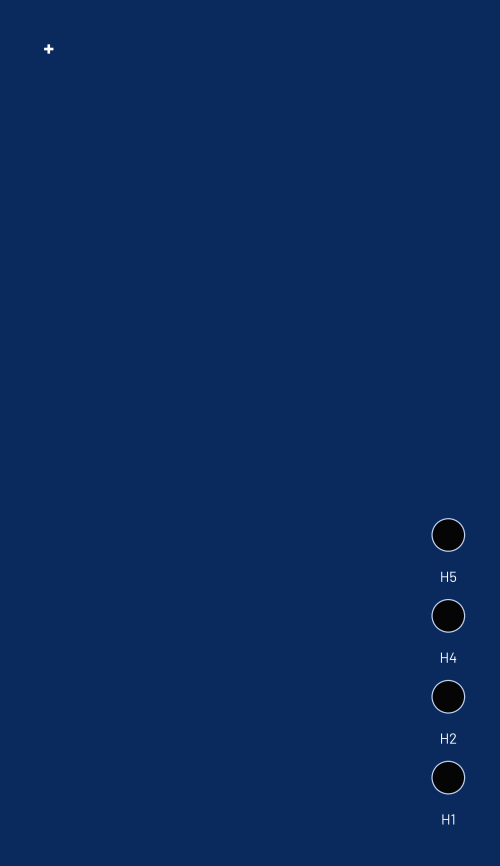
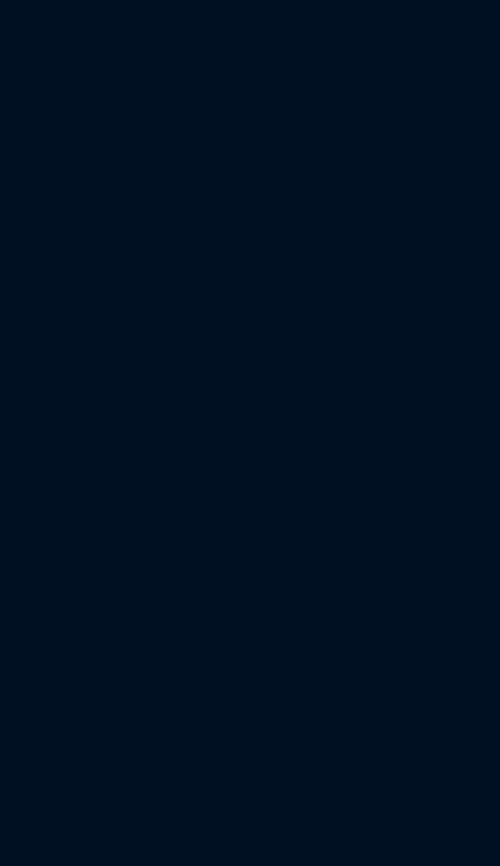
text: + (48, 49) -> none
H5: (448, 534) -> none
H4: (448, 615) -> none
H2: (448, 696) -> none
H1: (448, 777) -> none

